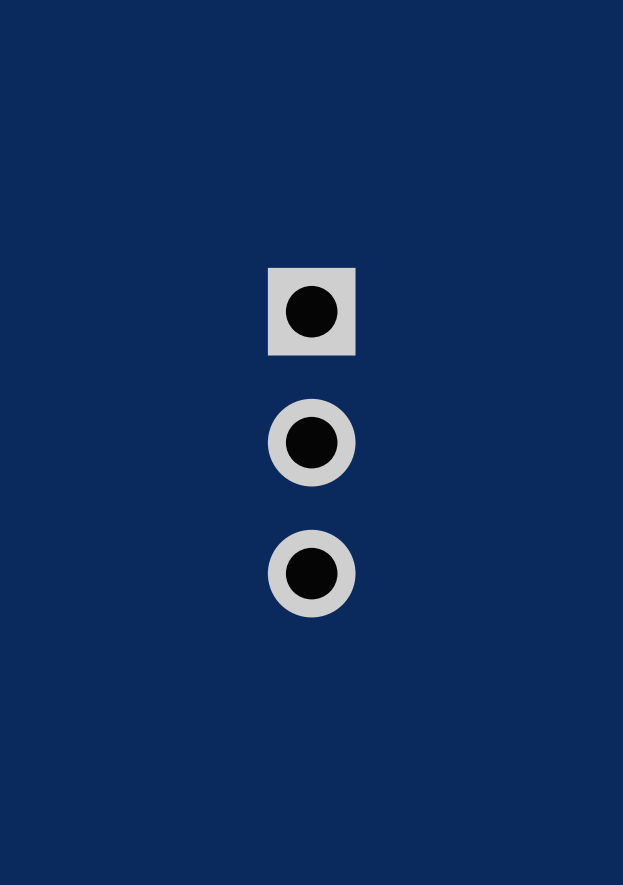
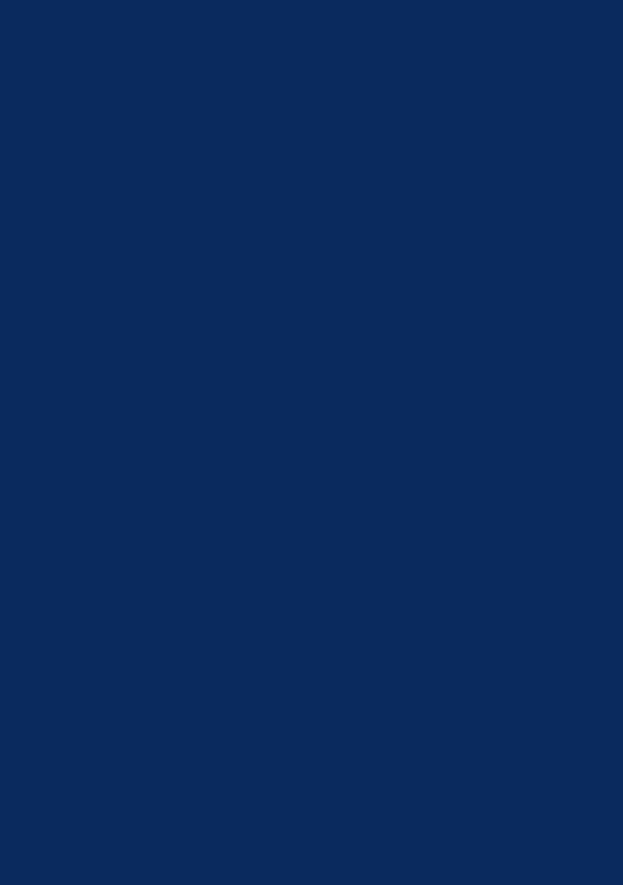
part: (311, 442) -> none

